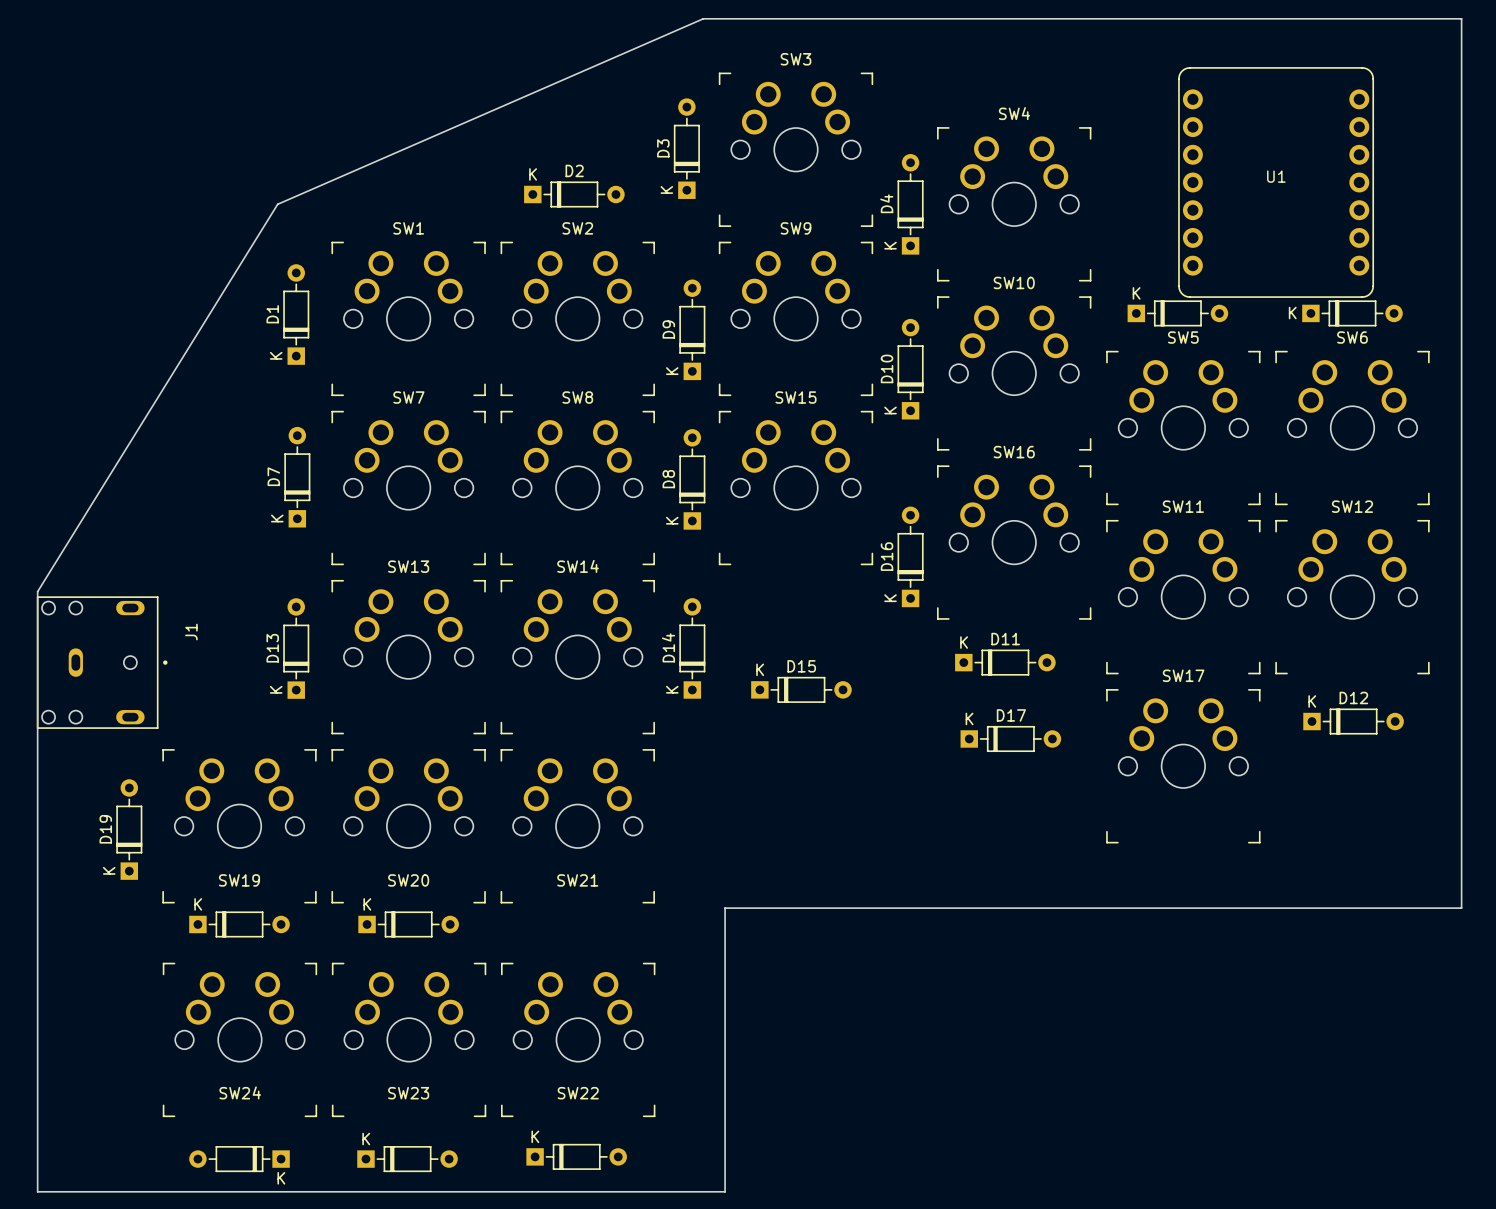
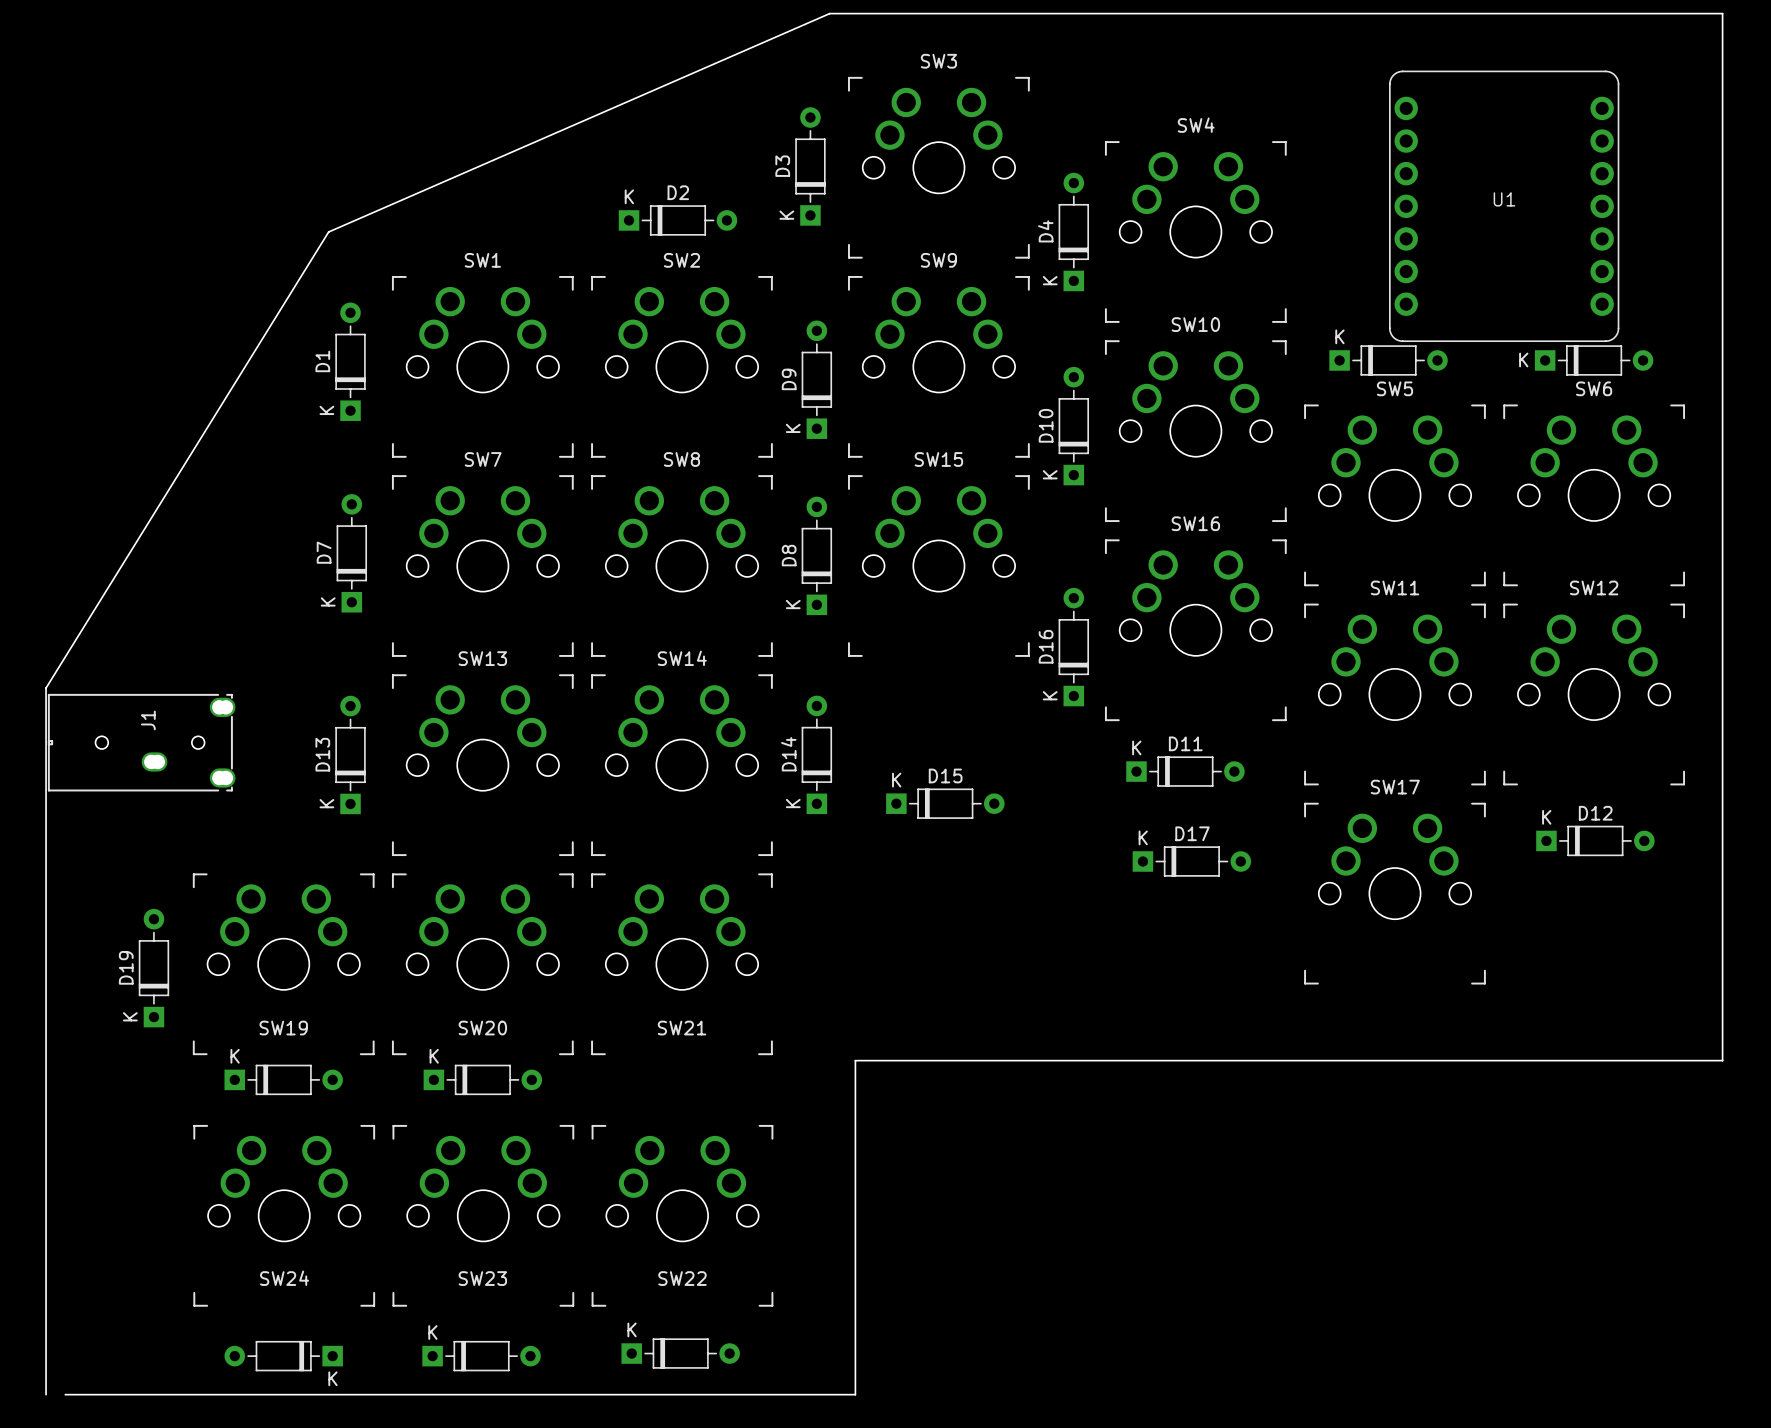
J1 footprint: [36, 596, 168, 729] -> [47, 693, 236, 792]
J1 name position: J1 (191, 632) -> J1 (148, 720)
board edge: (37, 1191) (54, 1191) -> none

